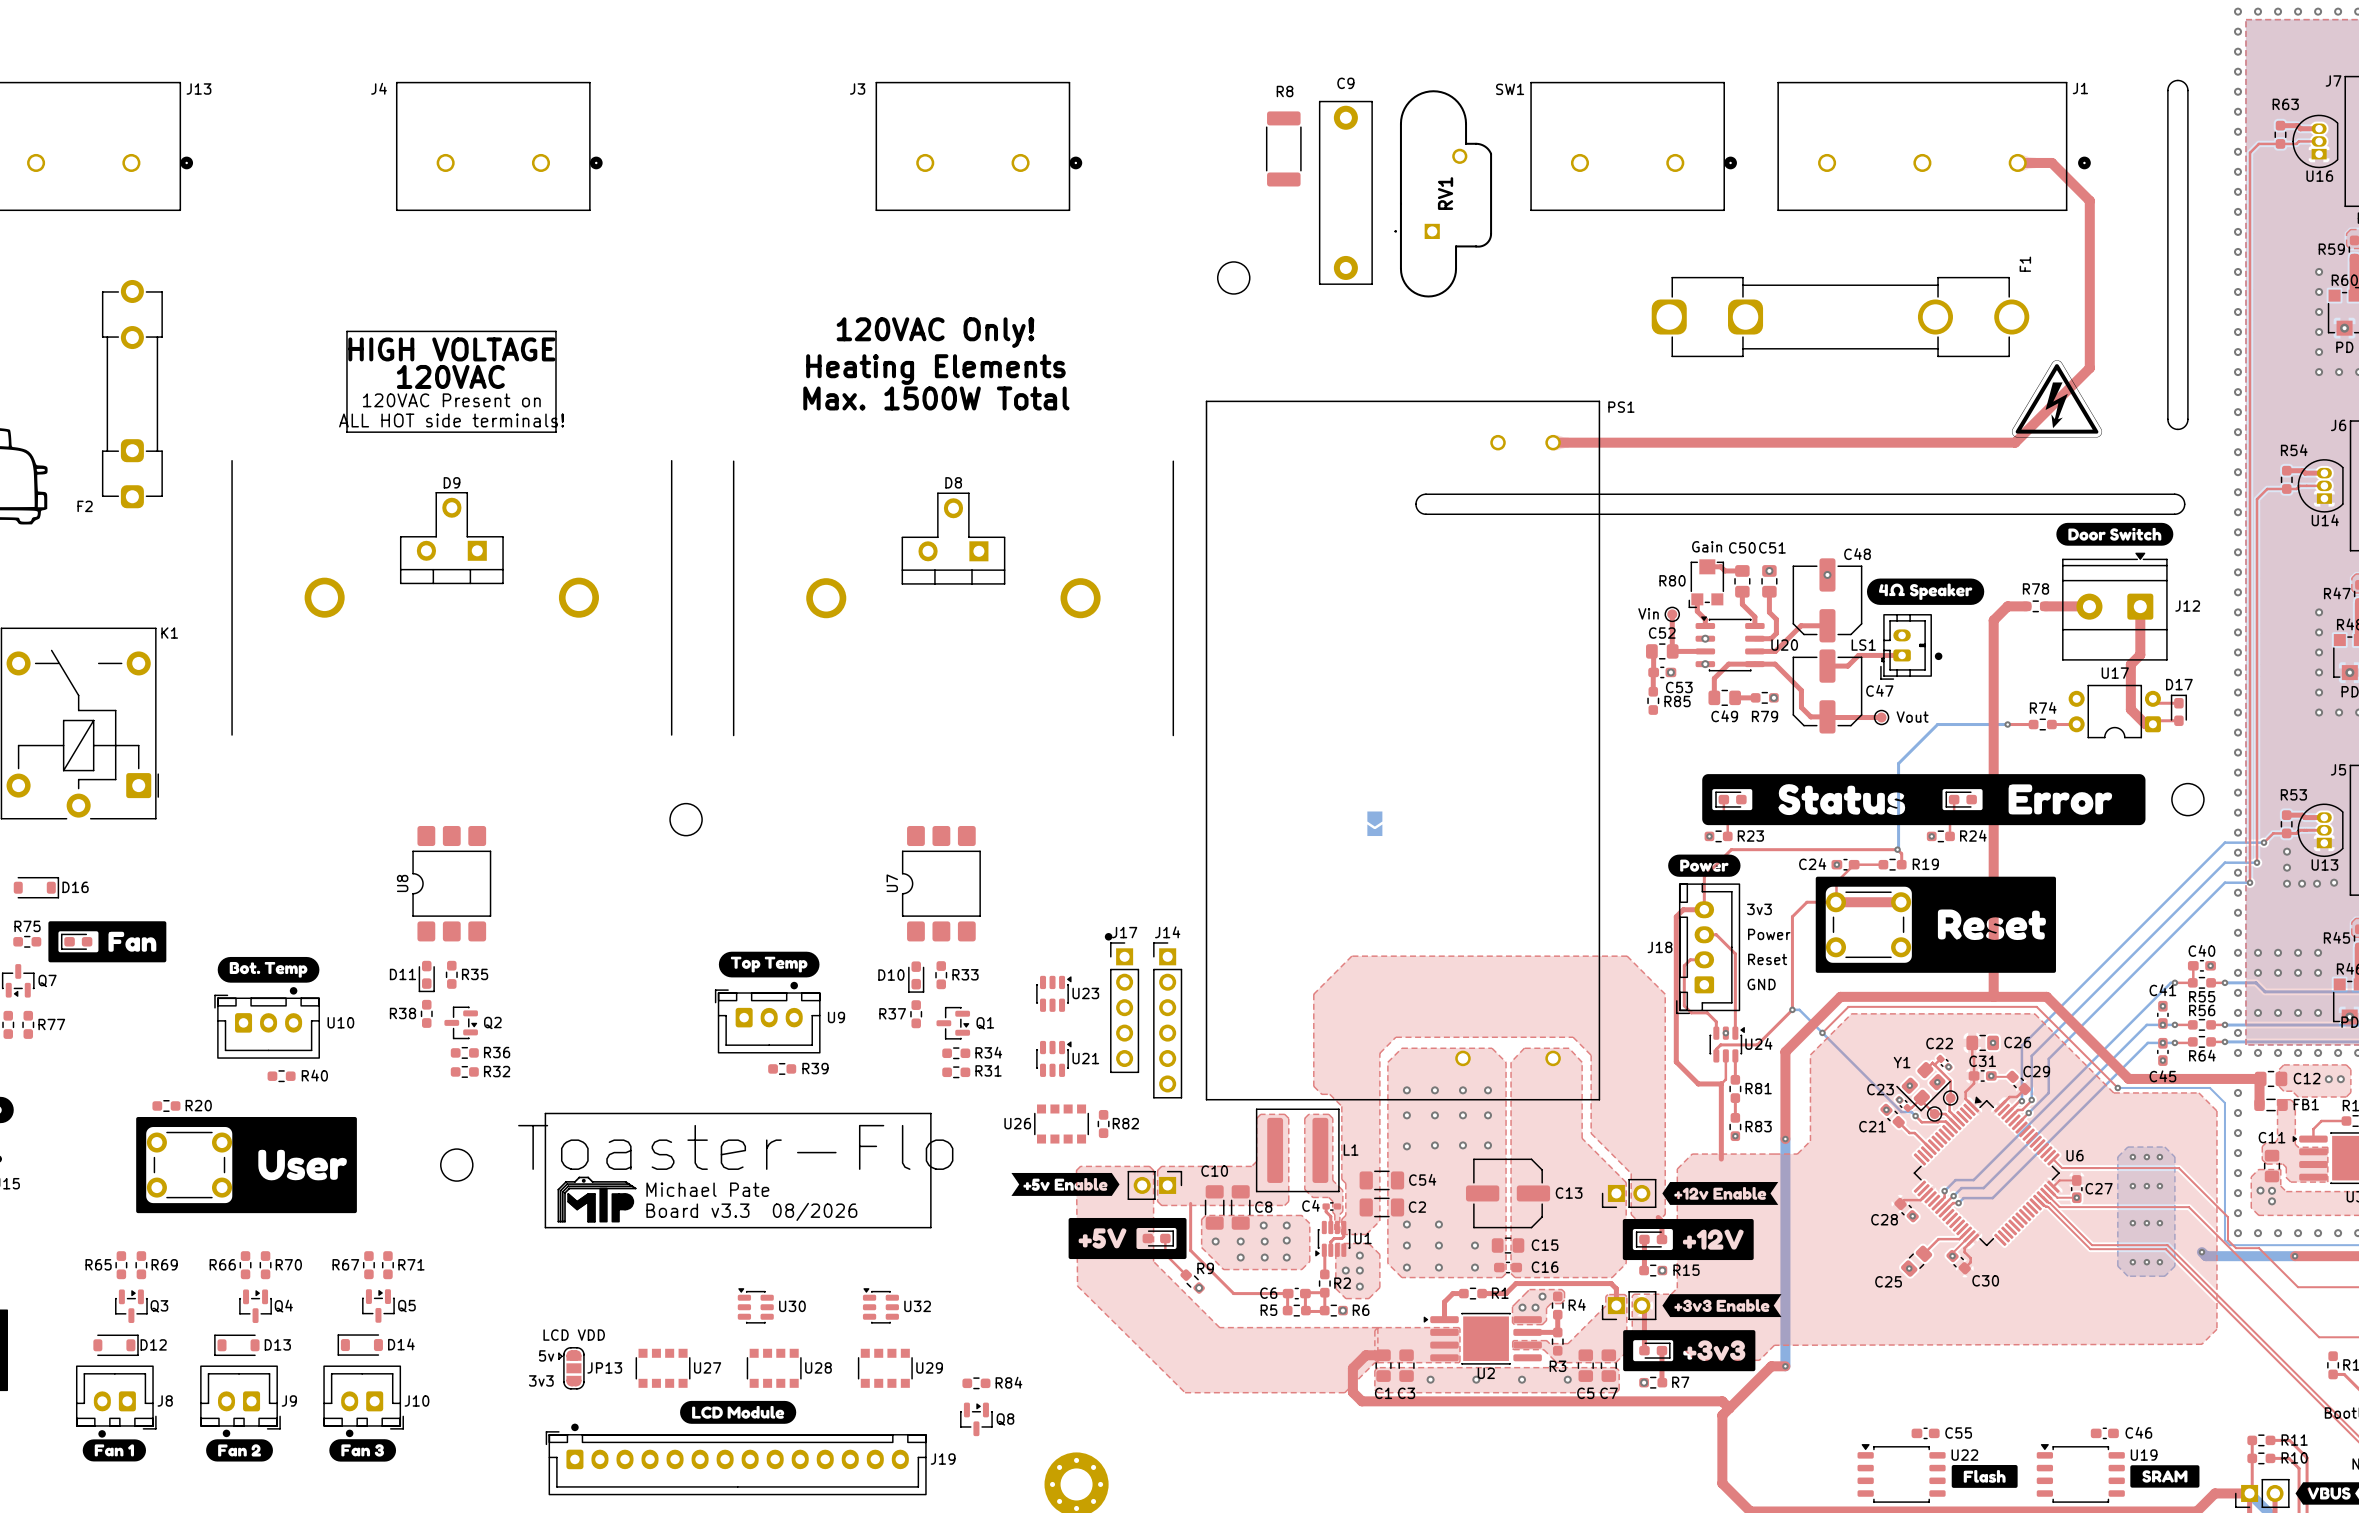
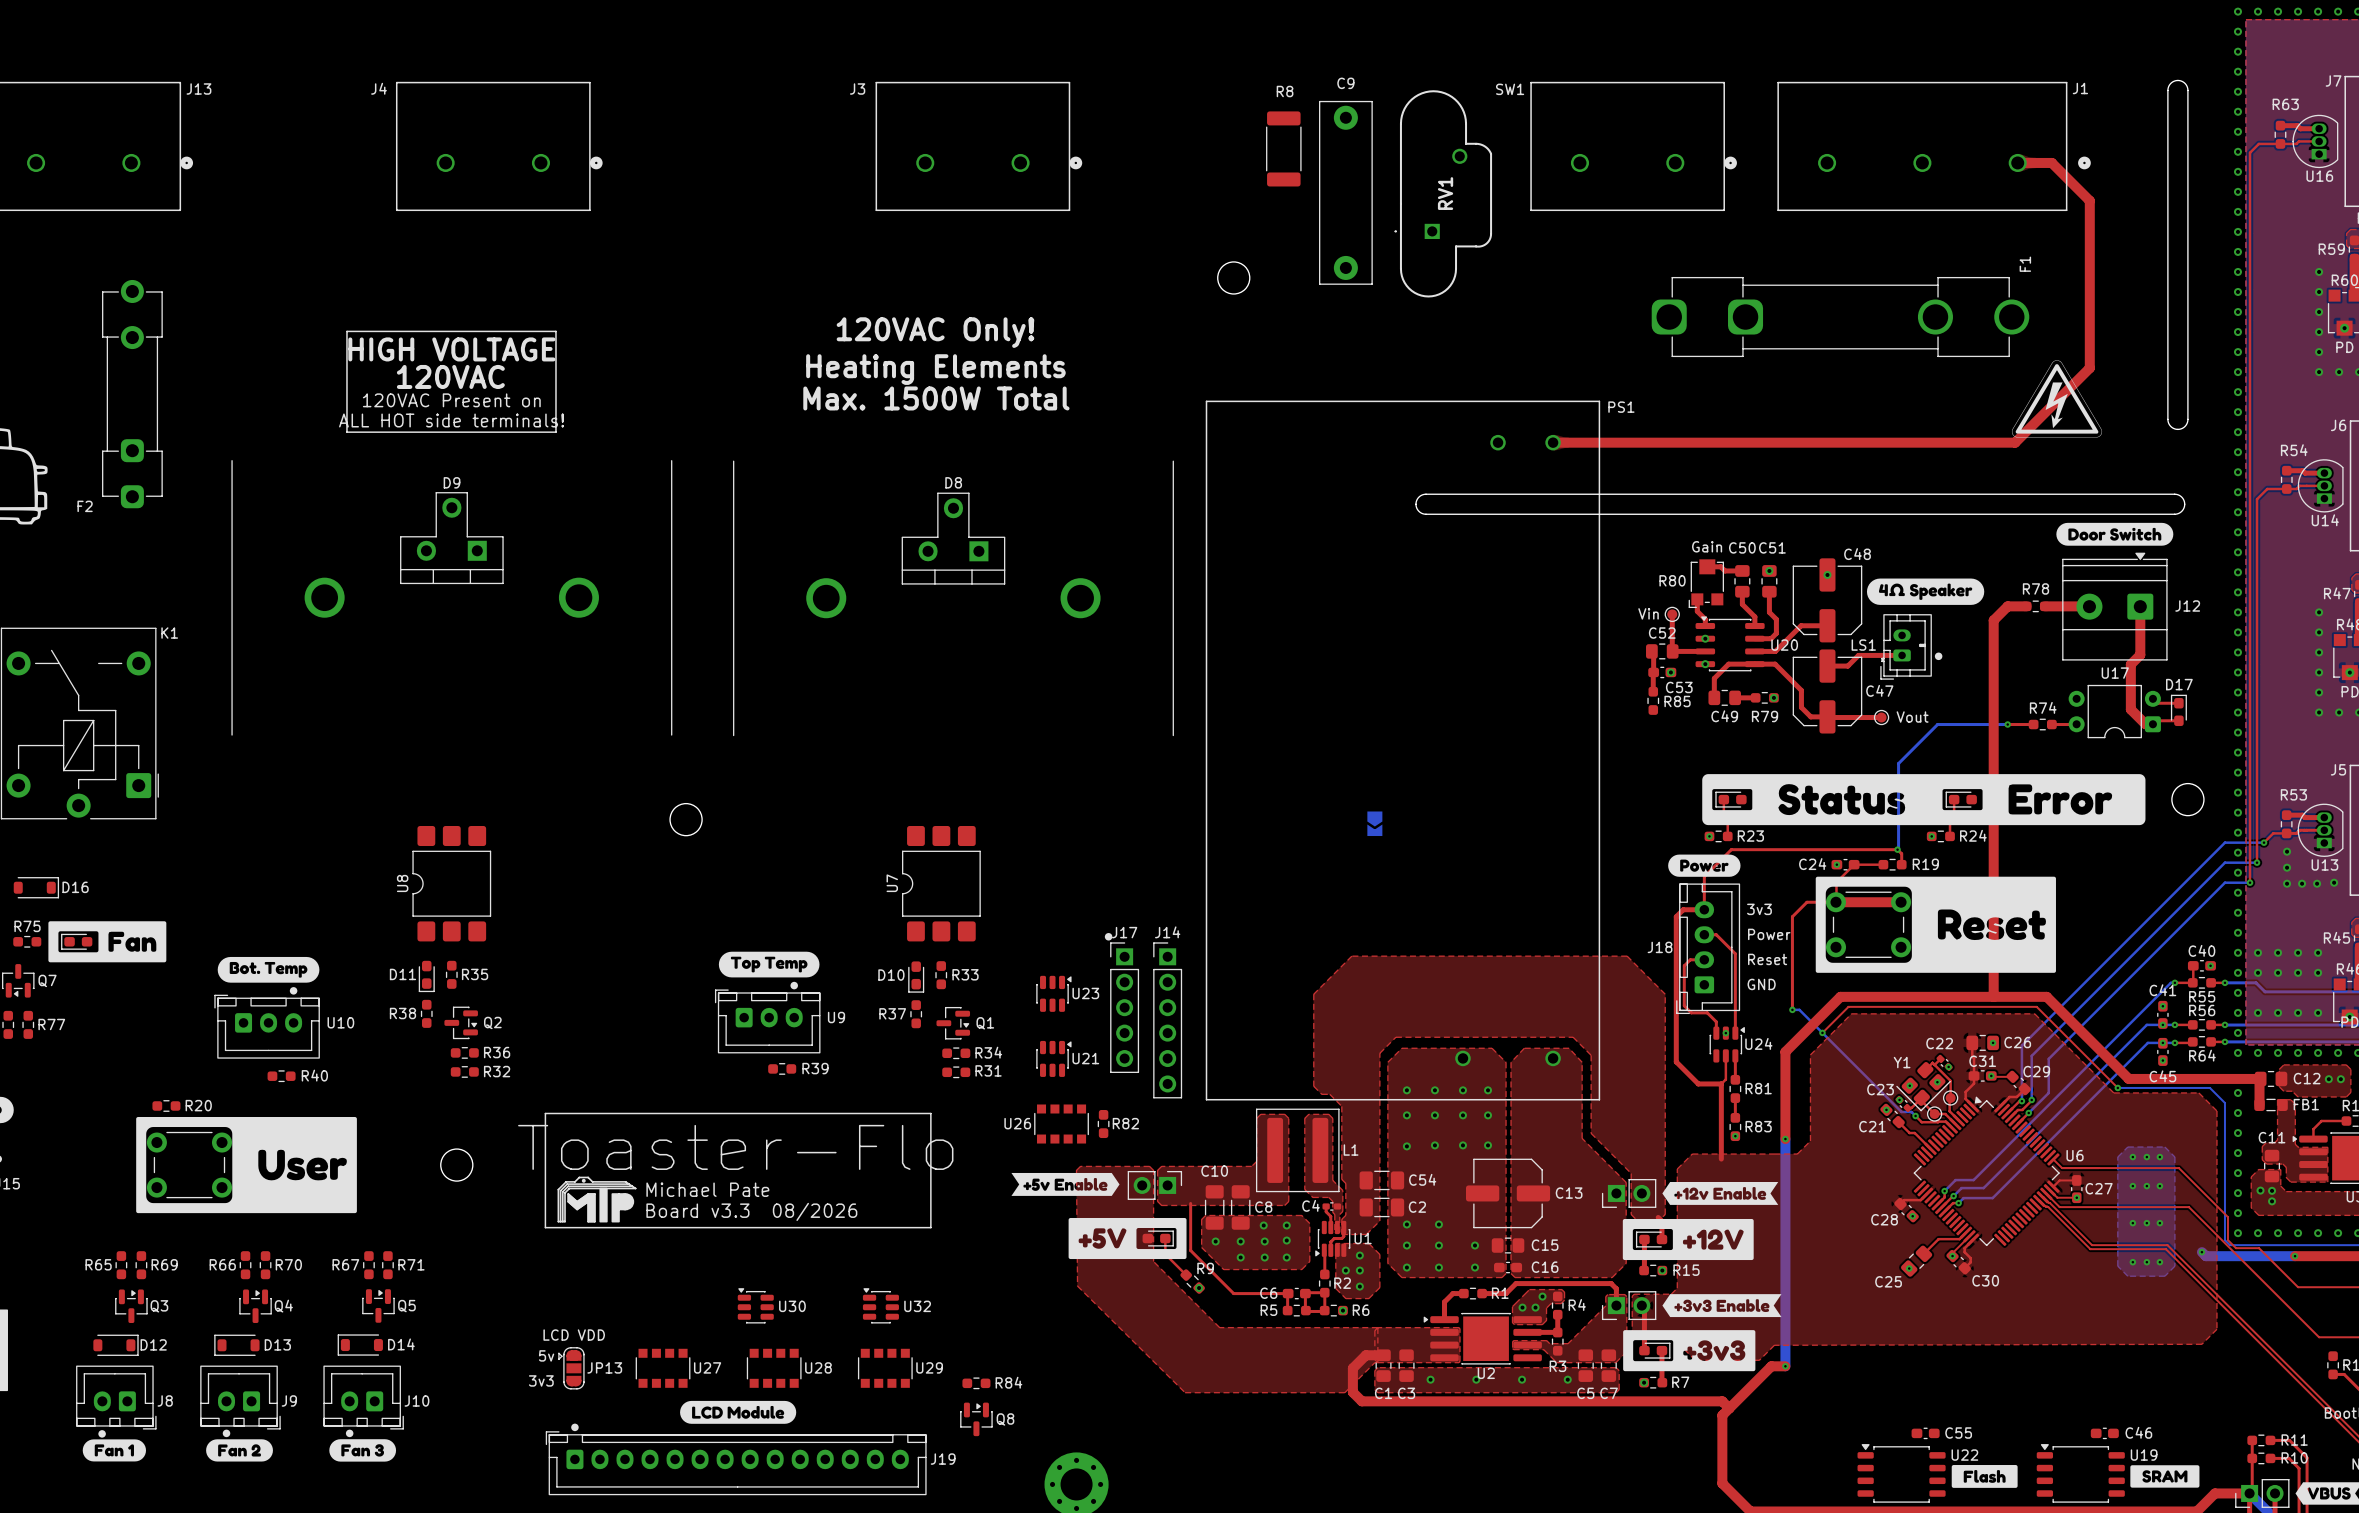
top track: (1792, 1009) (1757, 1044) (1720, 1044) (1716, 1049) (1716, 1055) -> none

